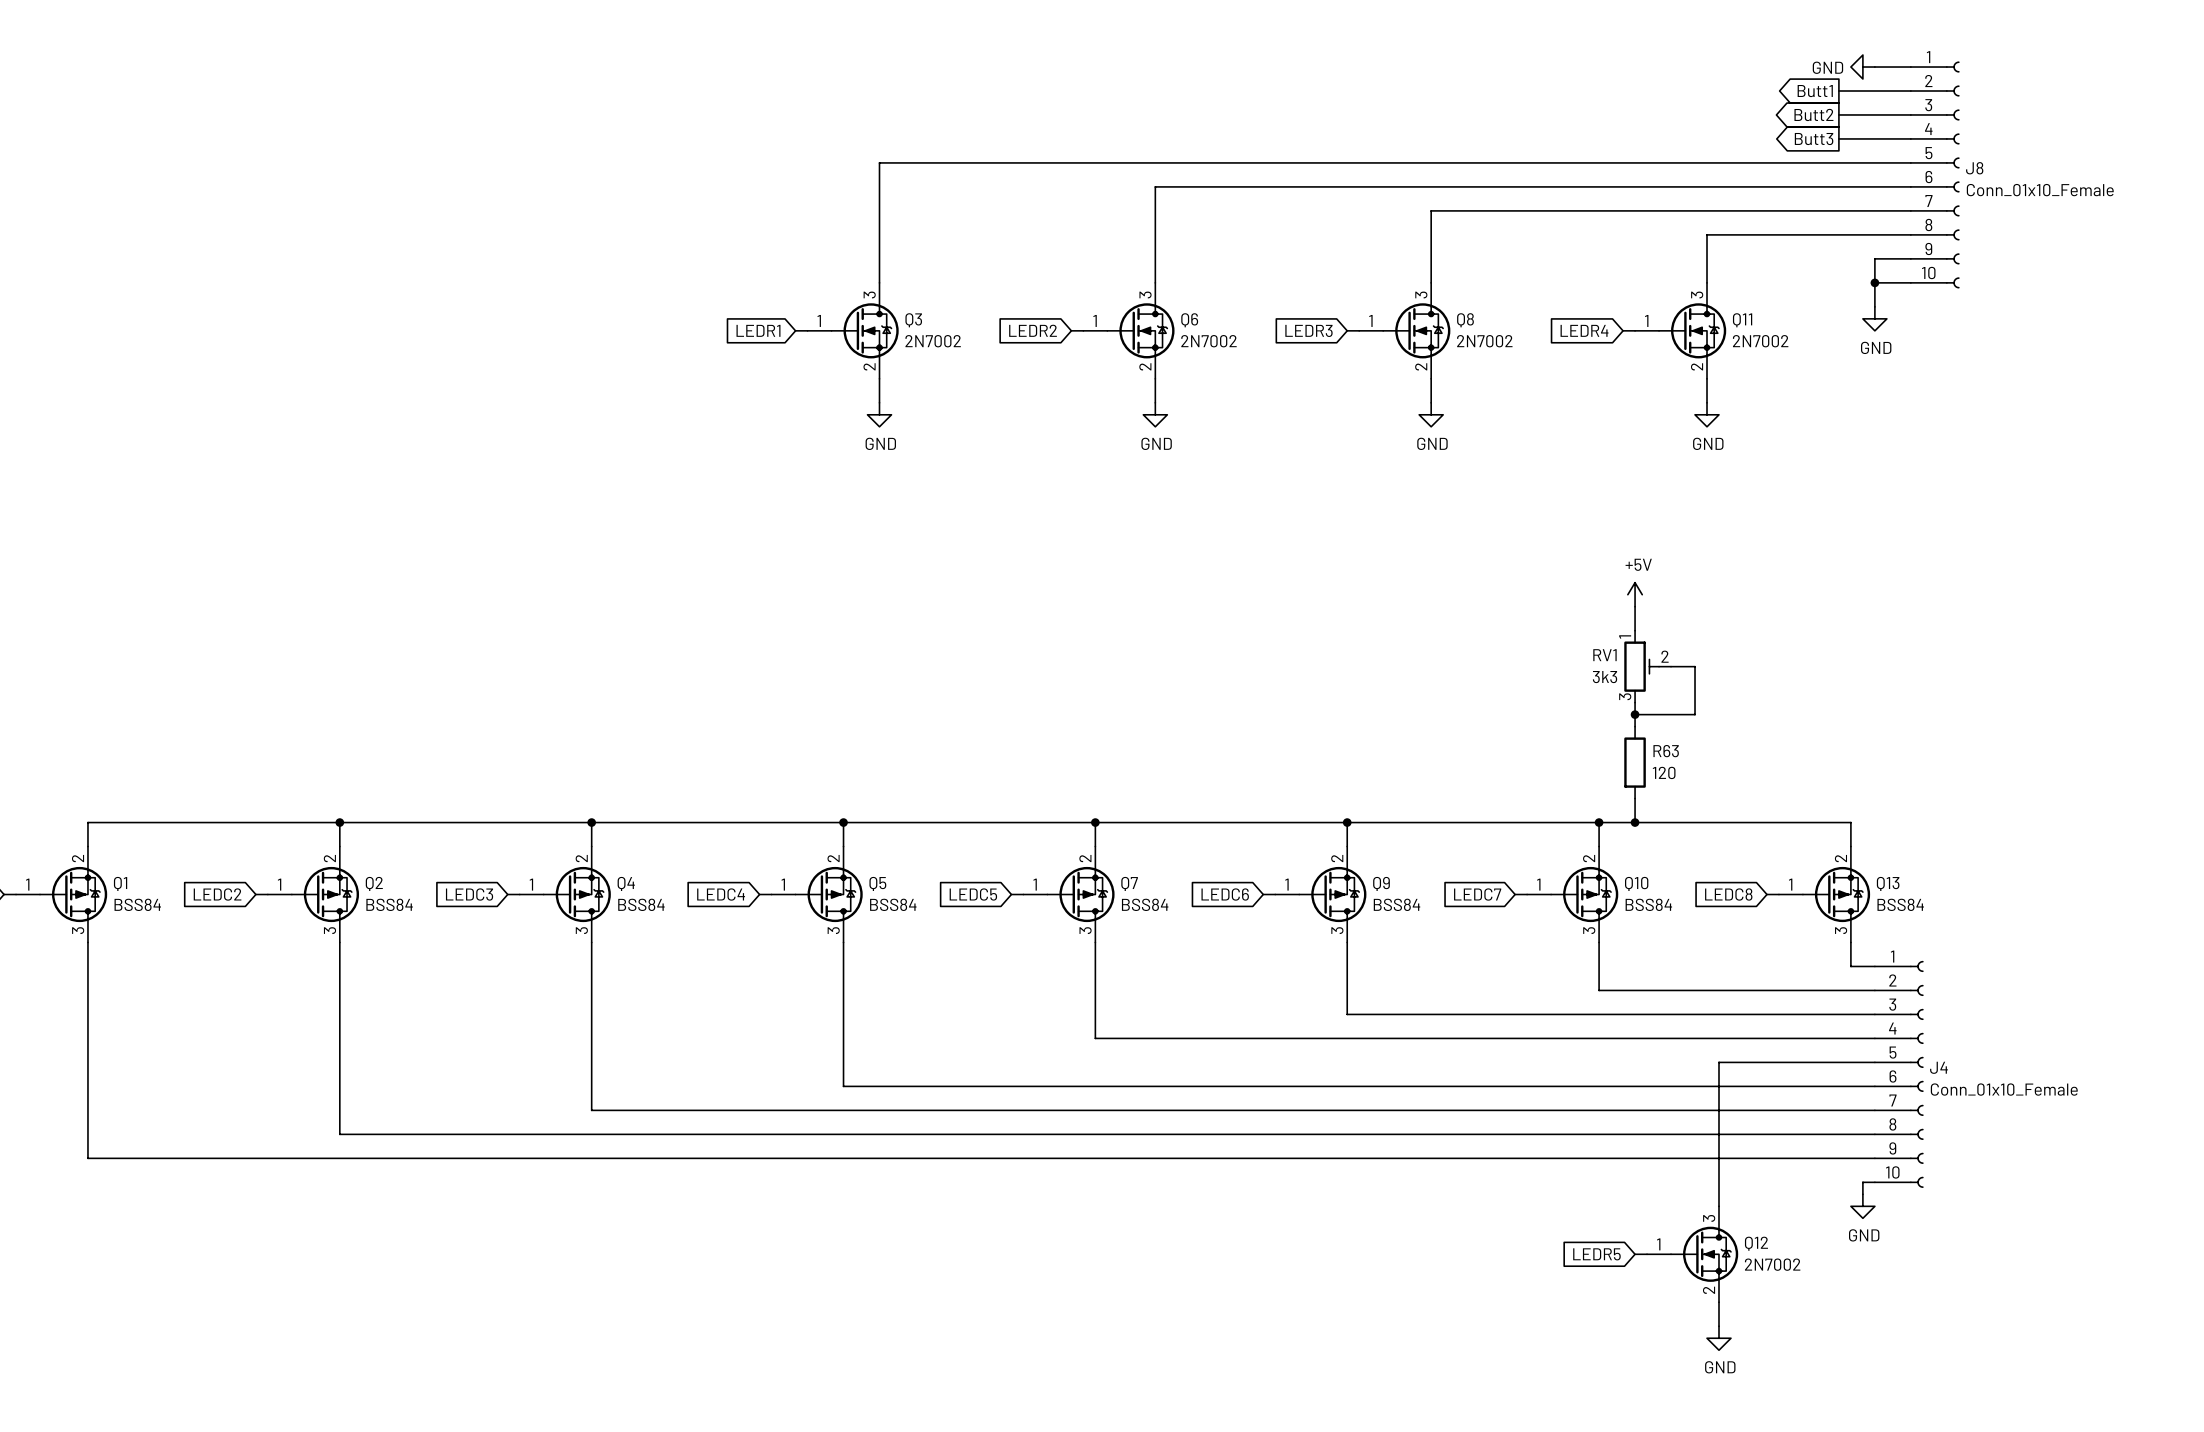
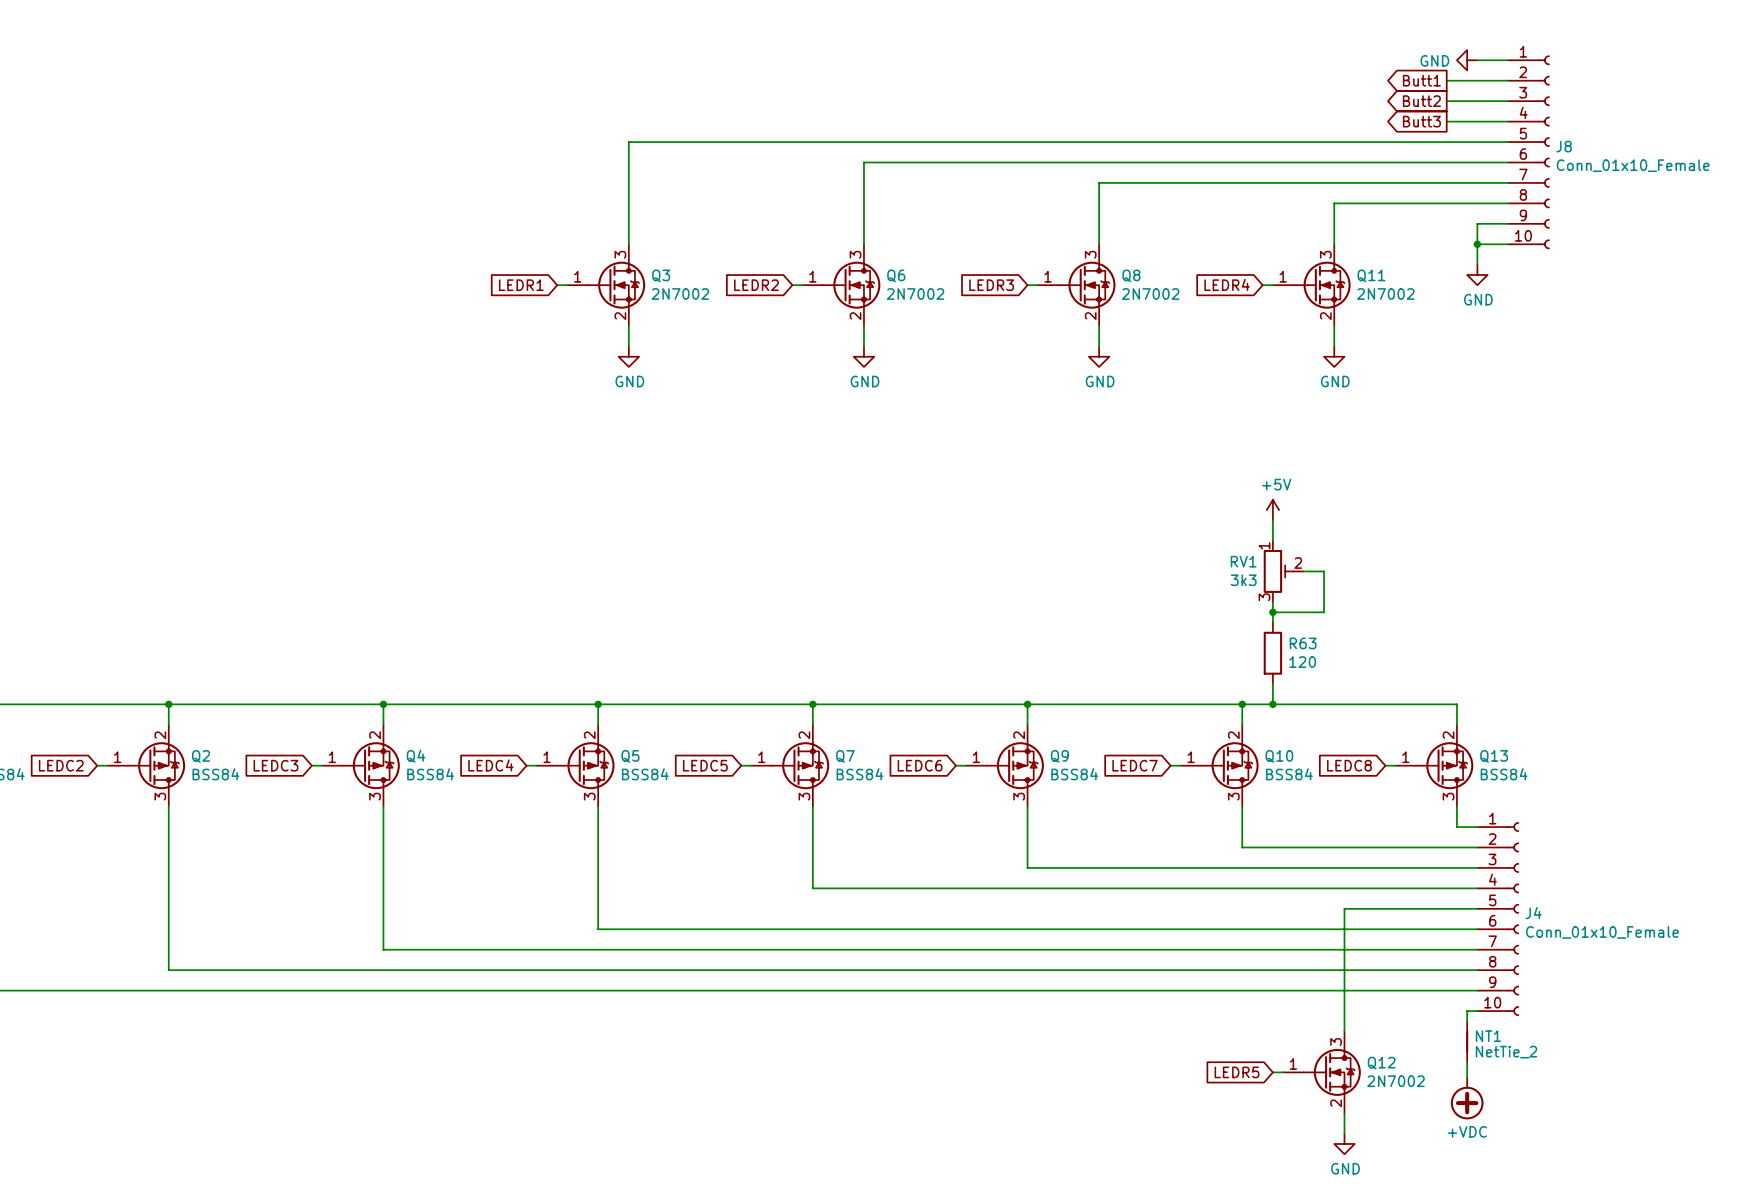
power symbol: GND (1862, 1206) -> none
NT1: none -> NetTie_2 (1467, 1041)
wire: none -> (1467, 1062) (1467, 1077)
power symbol: none -> +VDC (1467, 1098)

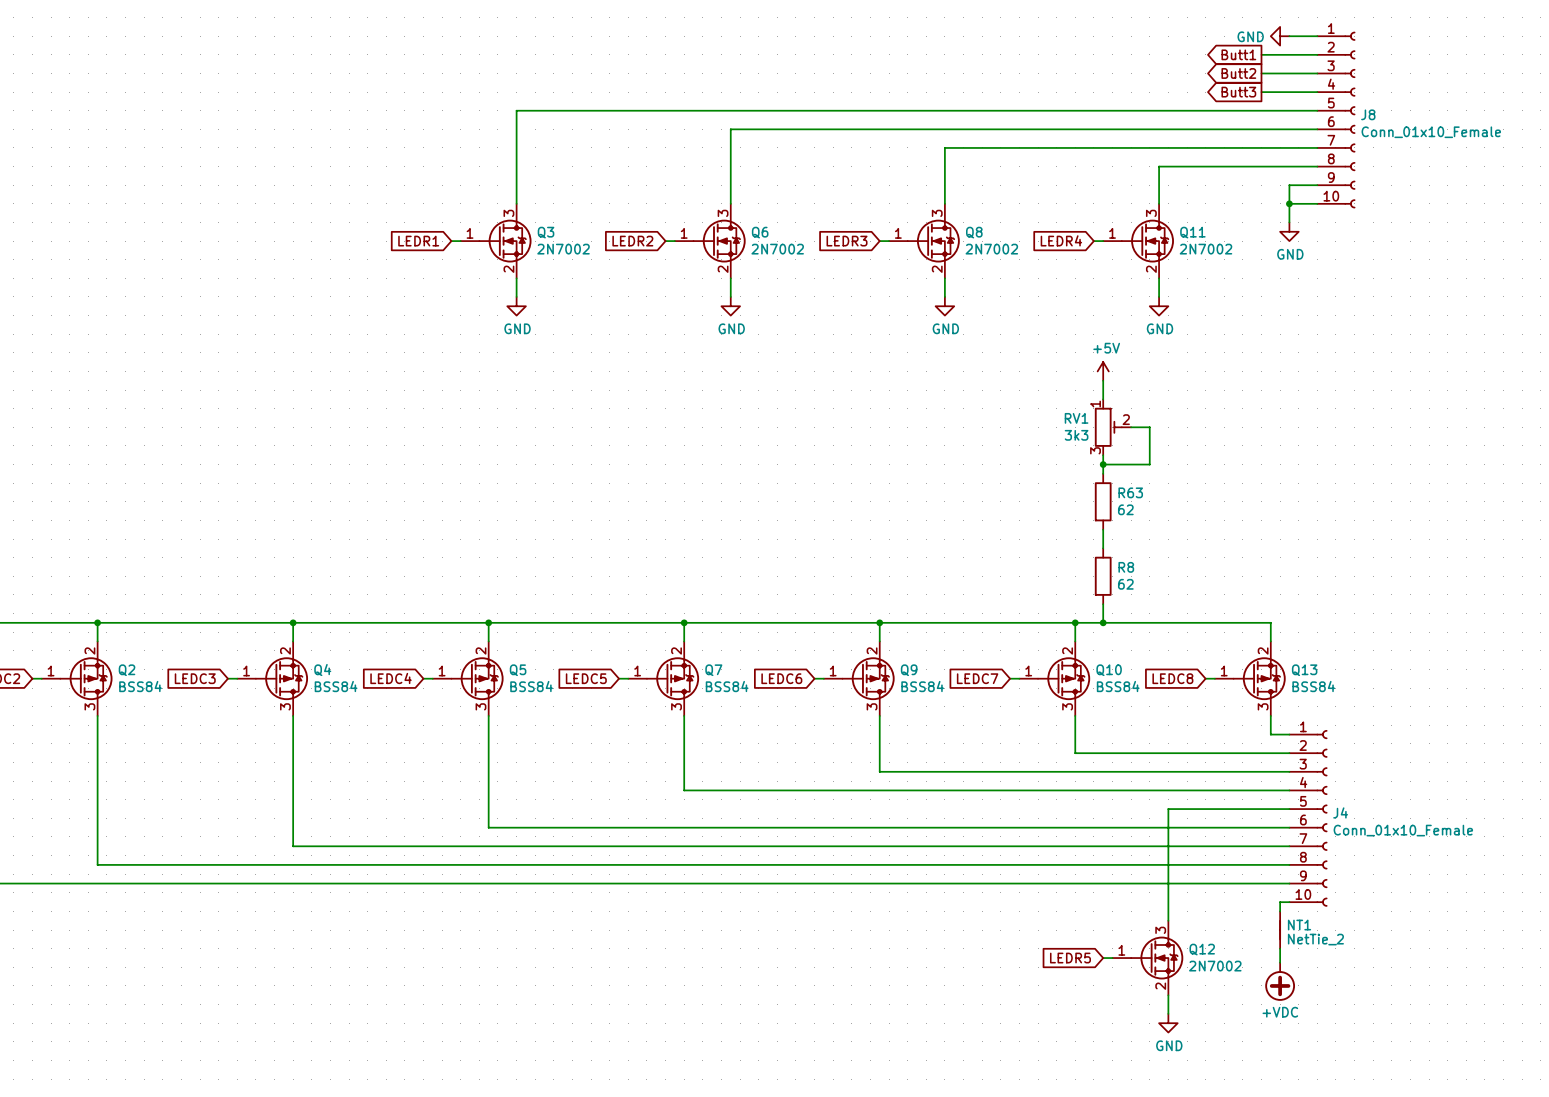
wire: none -> (1103, 380) (1103, 399)
power symbol position: +5V (1272, 510) -> +5V (1103, 371)
junction: none -> (1103, 464)
R63: none -> 62 (1103, 501)
RV1 position: (1283, 571) -> (1112, 427)
wire: (1303, 571) (1324, 571) (1324, 612) (1272, 612) -> (1131, 427) (1149, 427) (1149, 464) (1103, 464)
junction: (1272, 612) -> none
R63 name: R63 (1303, 643) -> R8 (1126, 567)
R63 value: 120 (1302, 662) -> 62 (1125, 584)

